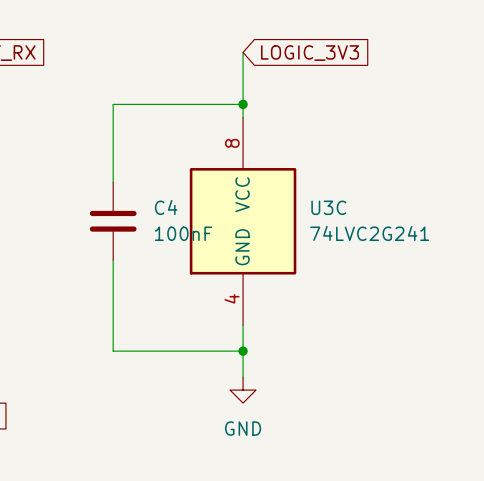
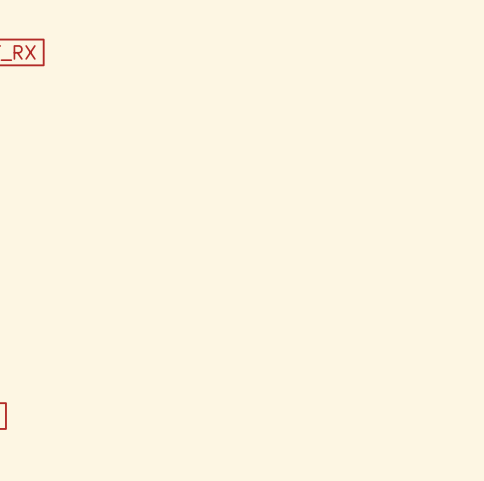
wire: (243, 52) (243, 117) -> none
global label: LOGIC_3V3 (310, 53) -> none
wire: (243, 104) (113, 104) (113, 182) -> none
junction: (243, 104) -> none
C4: 100nF (113, 221) -> none
U3C: 74LVC2G241 (243, 221) -> none
wire: (113, 260) (113, 351) (243, 351) -> none
wire: (243, 325) (243, 377) -> none
junction: (243, 351) -> none
power symbol: GND (243, 390) -> none

